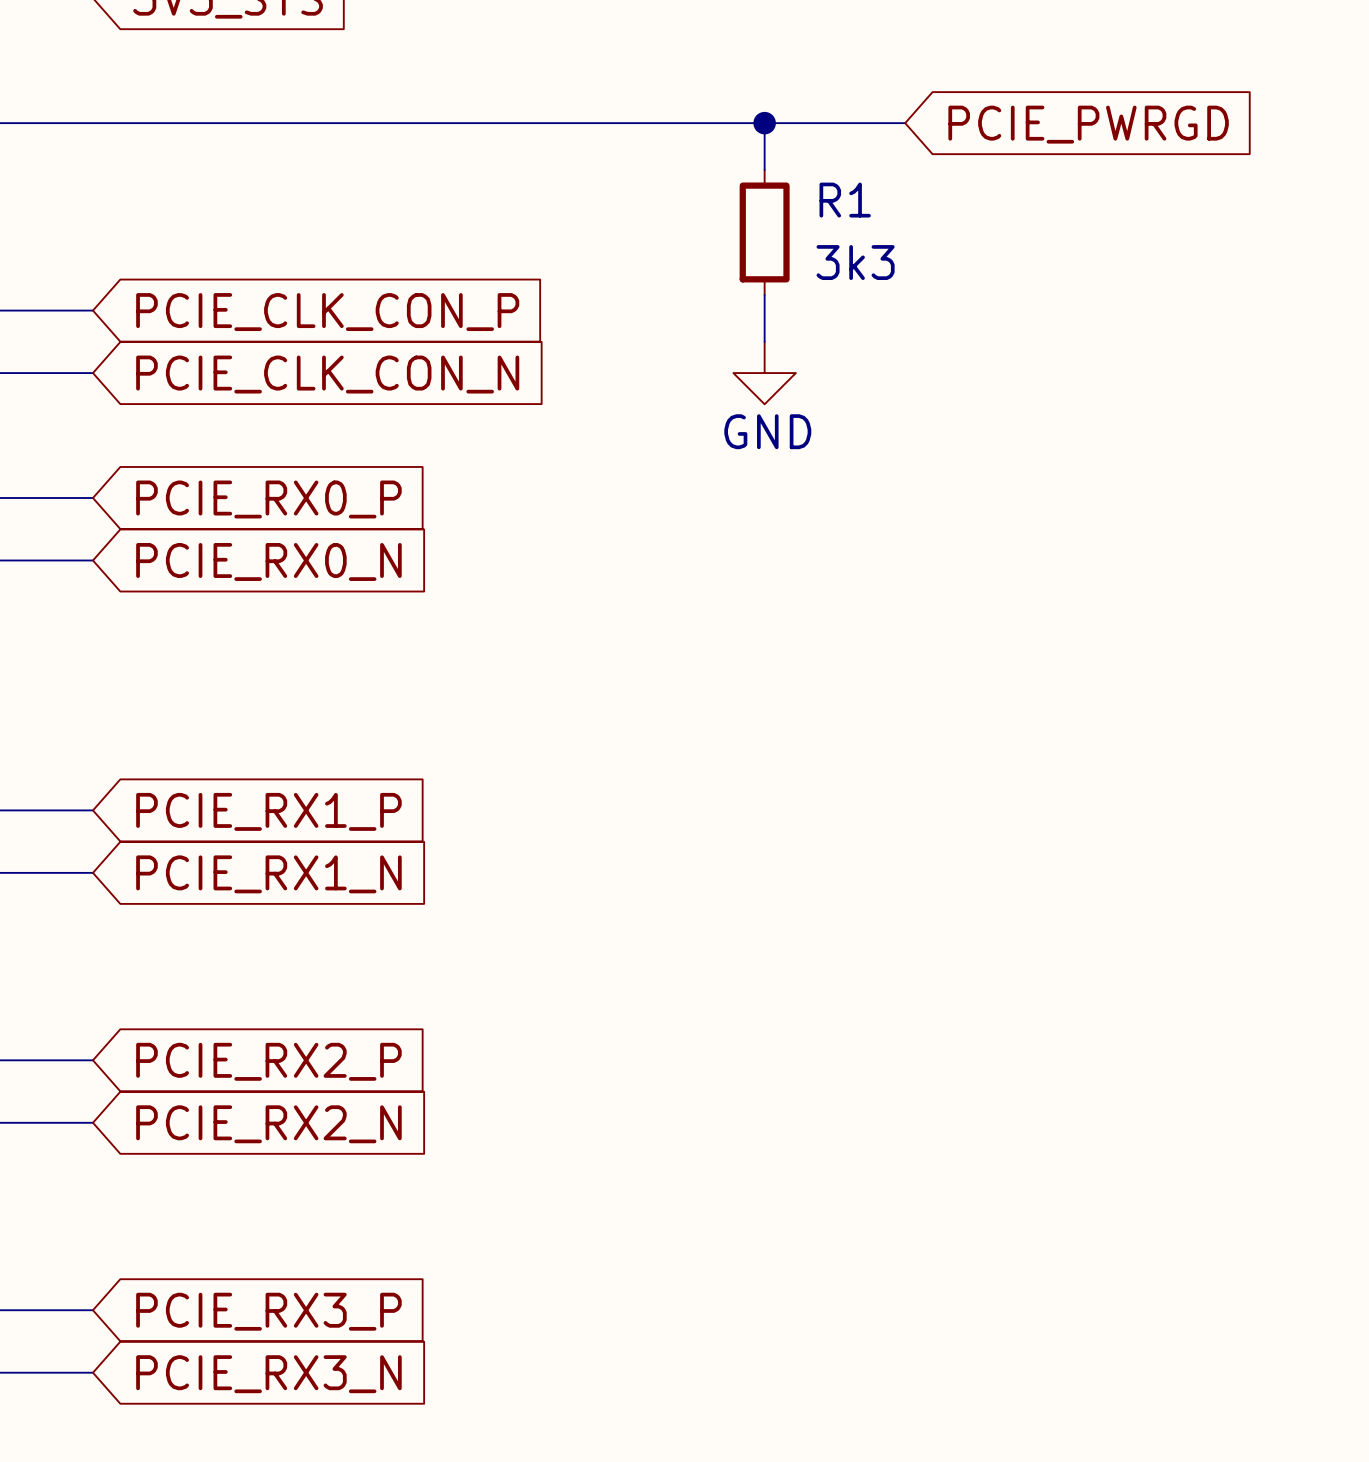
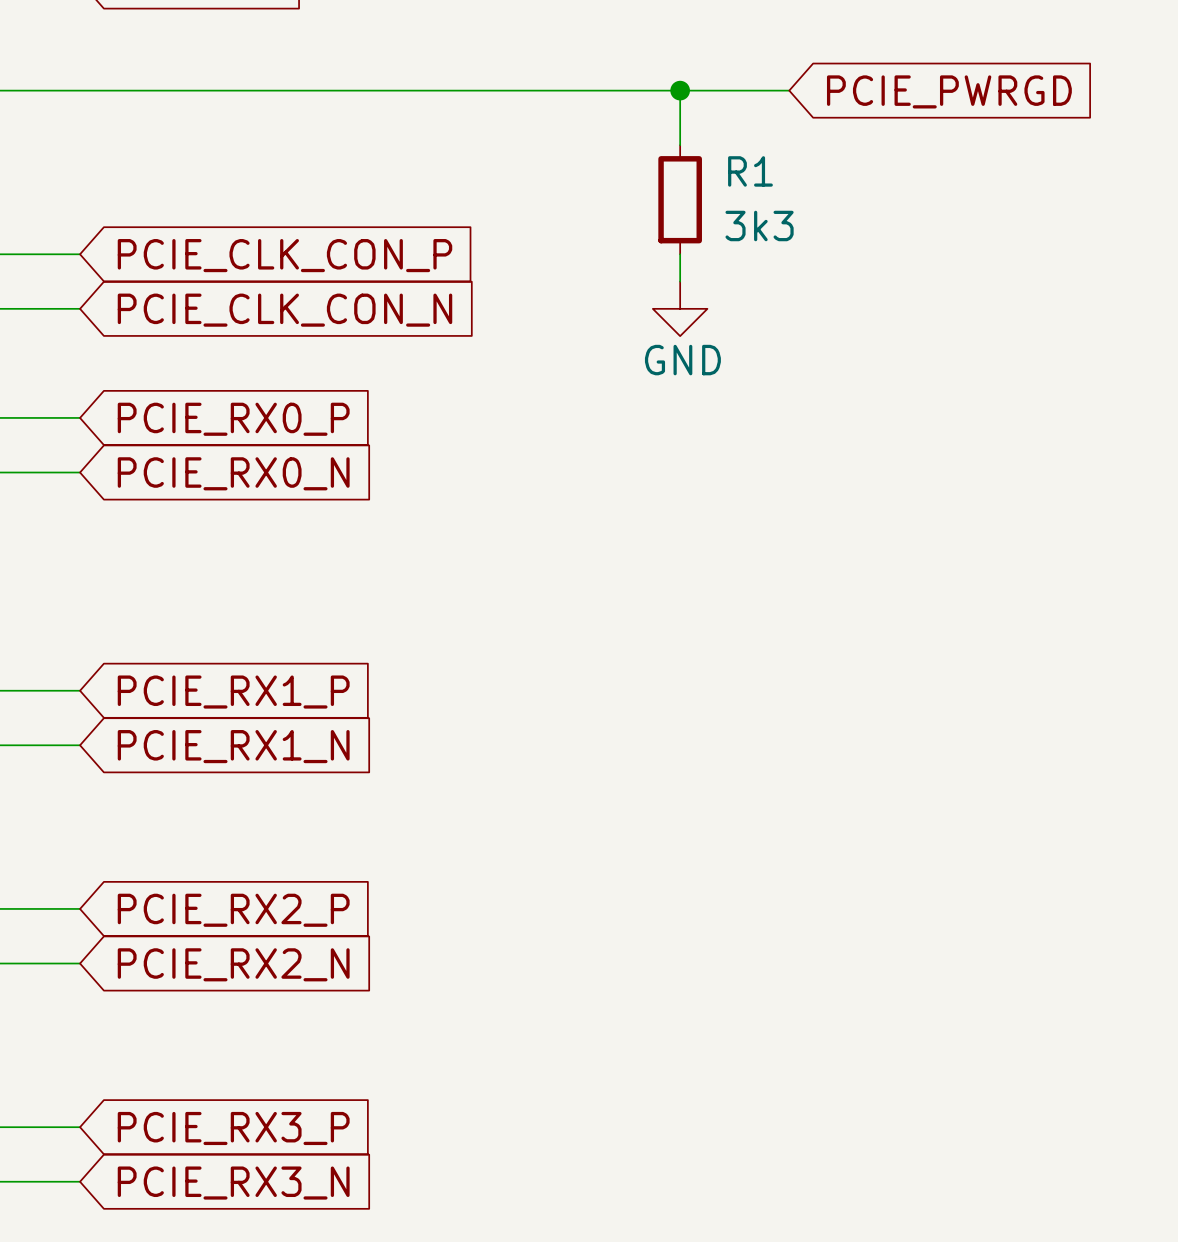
wire: (764, 123) (764, 169) -> none
junction position: (764, 123) -> (680, 90)
wire: none -> (680, 90) (680, 145)
R1 position: (764, 232) -> (680, 199)
wire: (764, 294) (764, 341) -> none
wire: none -> (680, 254) (680, 281)
power symbol position: GND (764, 373) -> GND (680, 308)

